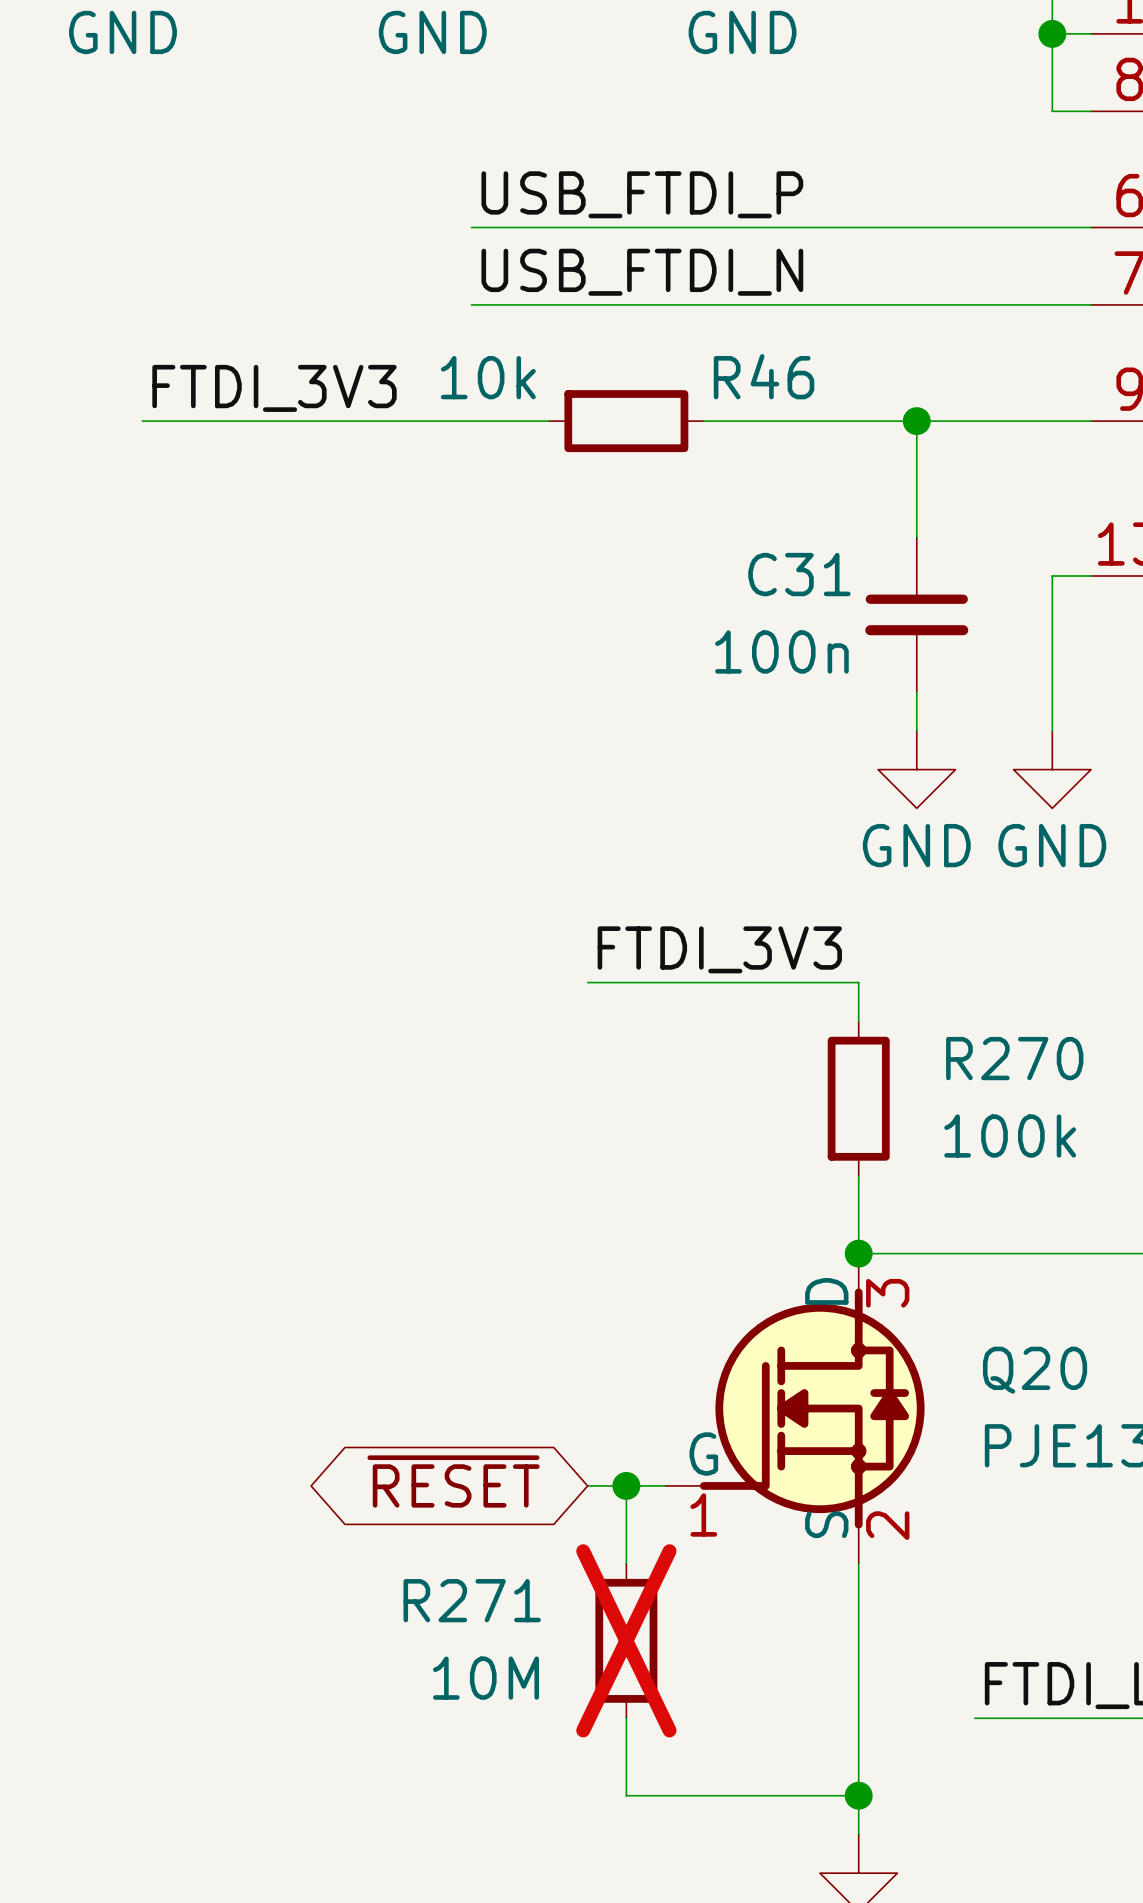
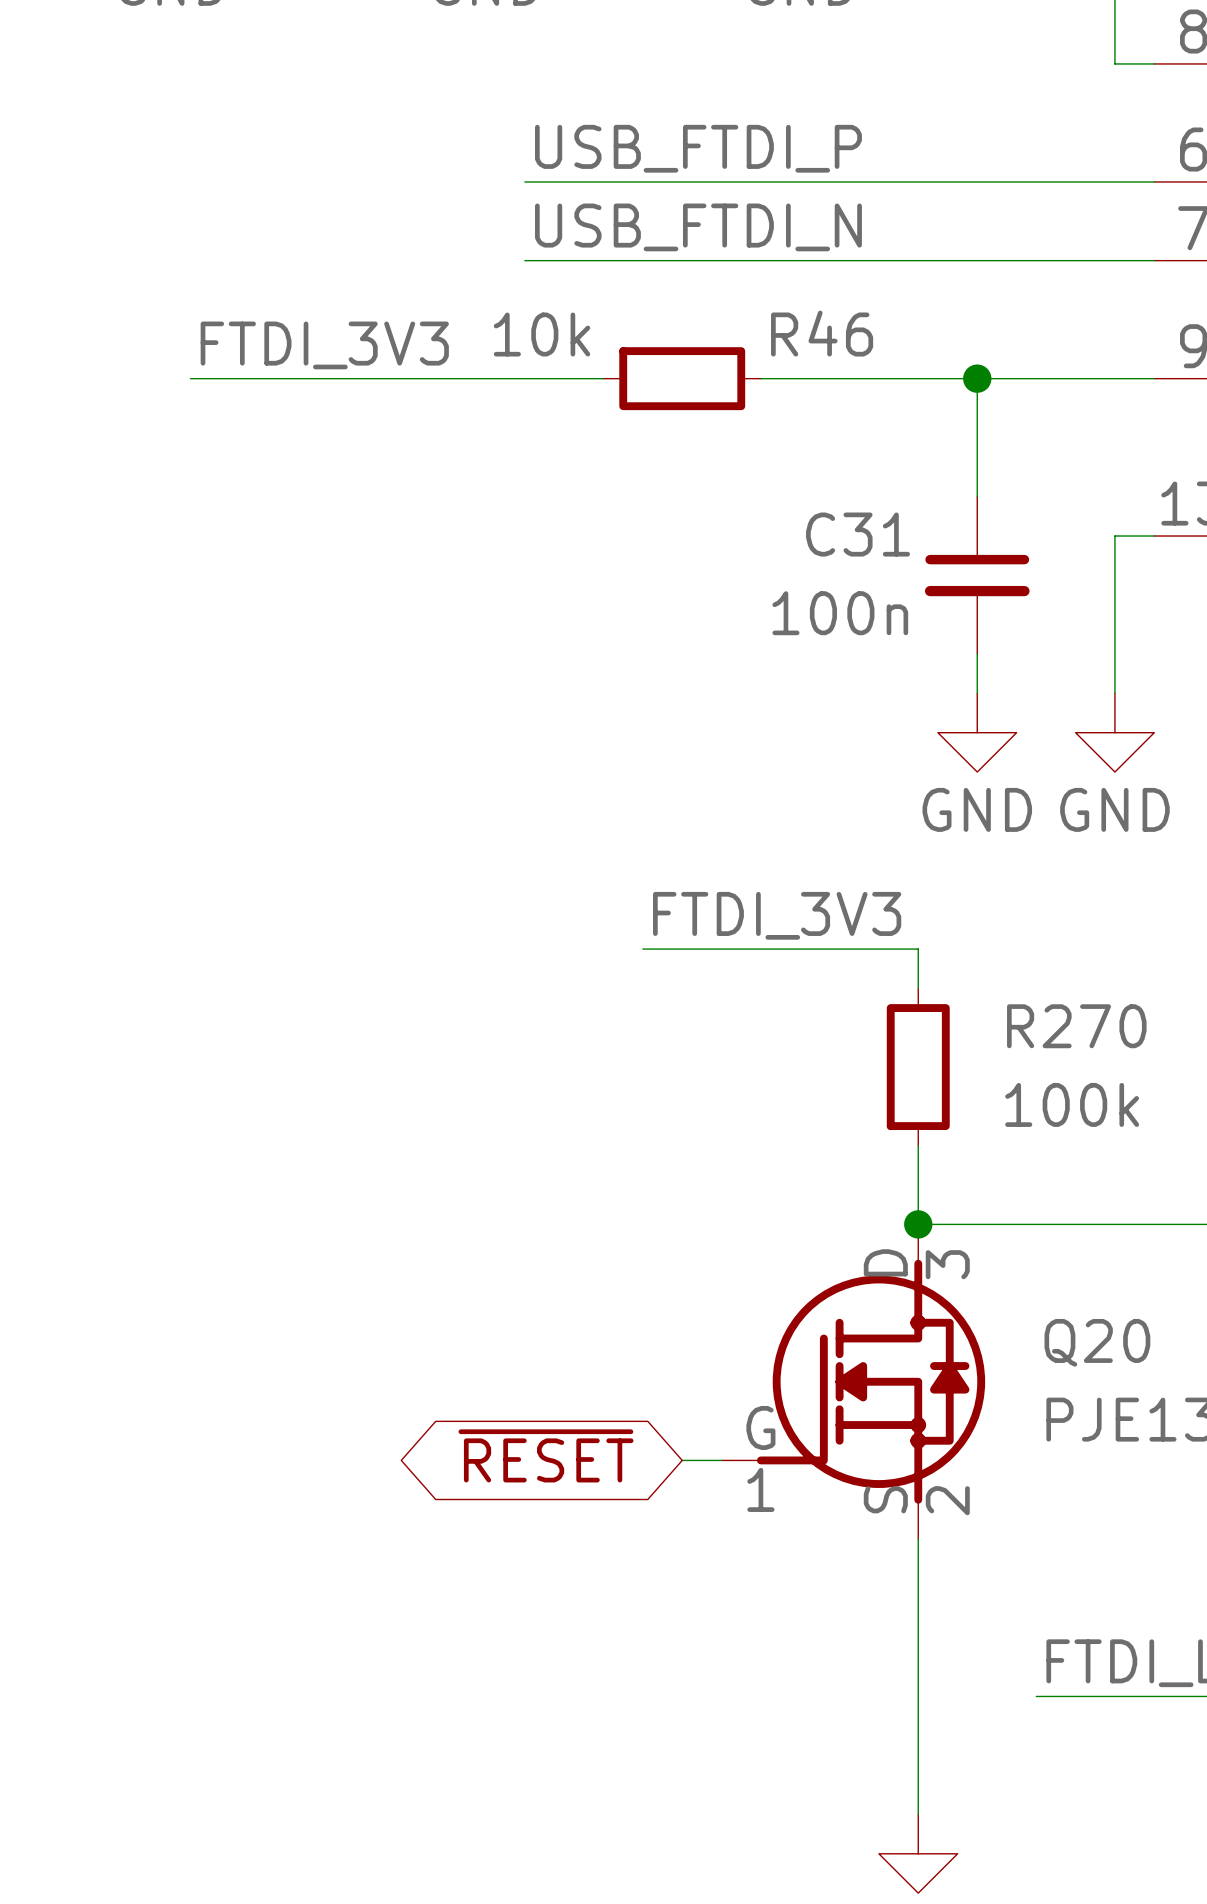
global label position: ~{RESET} (453, 1481) -> ~{RESET} (546, 1455)
wire: (587, 1485) (626, 1485) (626, 1563) -> none
junction: (626, 1485) -> none
R271: (626, 1640) -> none
wire: (626, 1718) (626, 1795) (858, 1795) -> none
junction: (858, 1795) -> none

